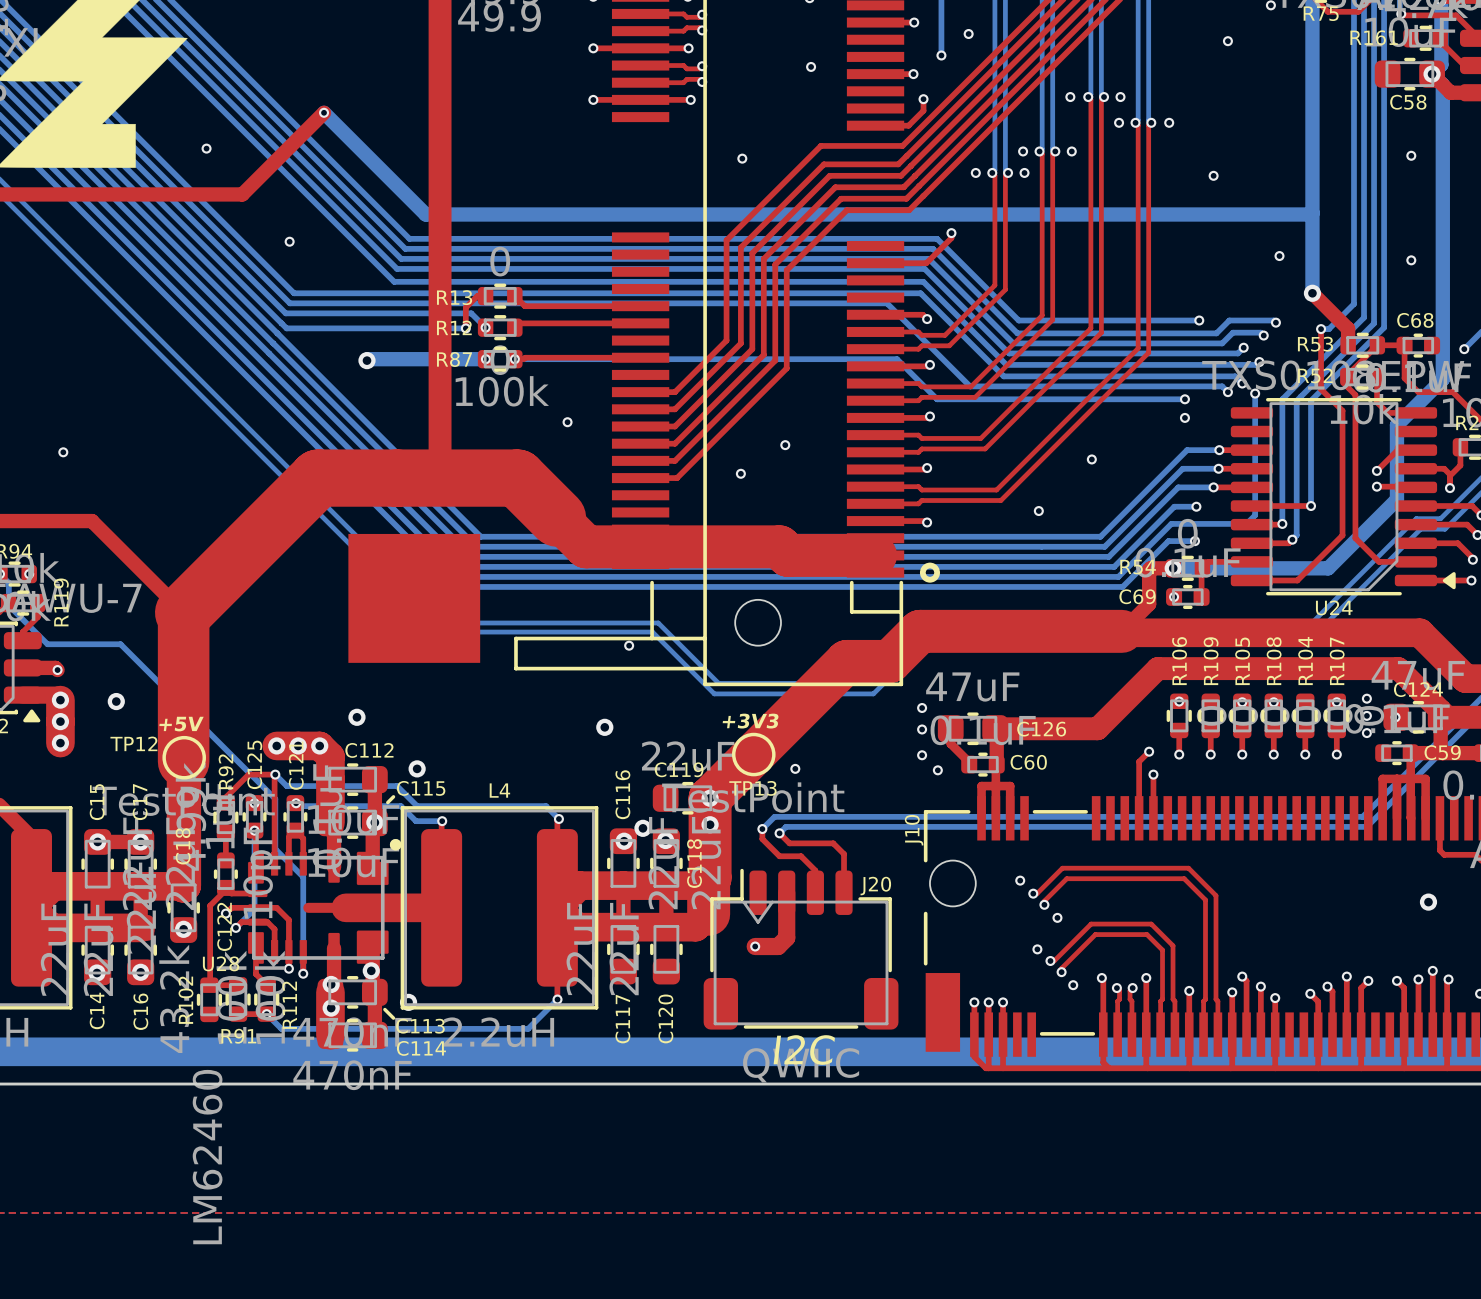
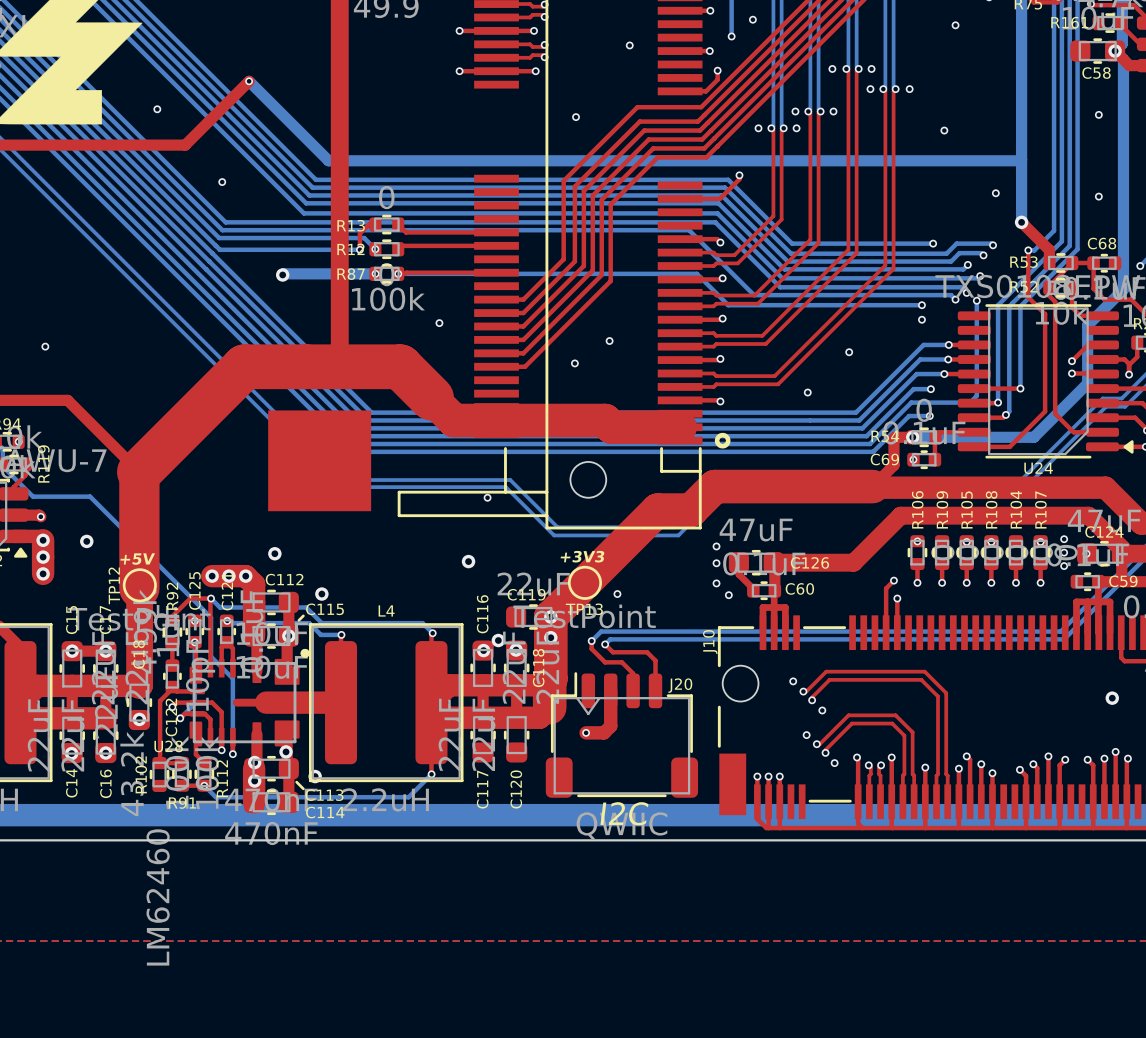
TP12 name rotation: 0° (133, 743) -> 90° counterclockwise (114, 585)

